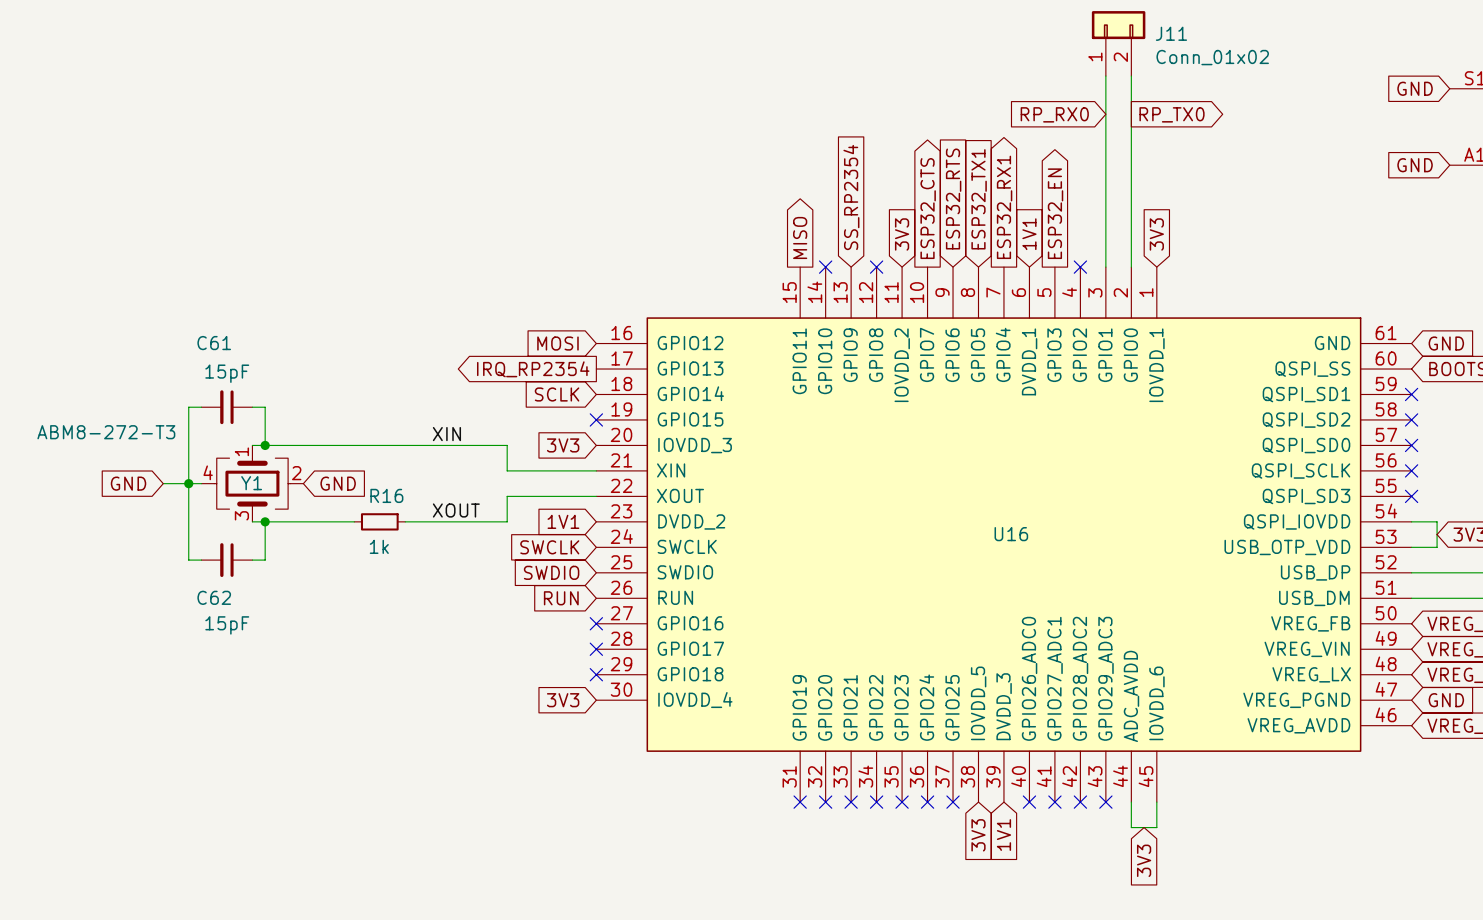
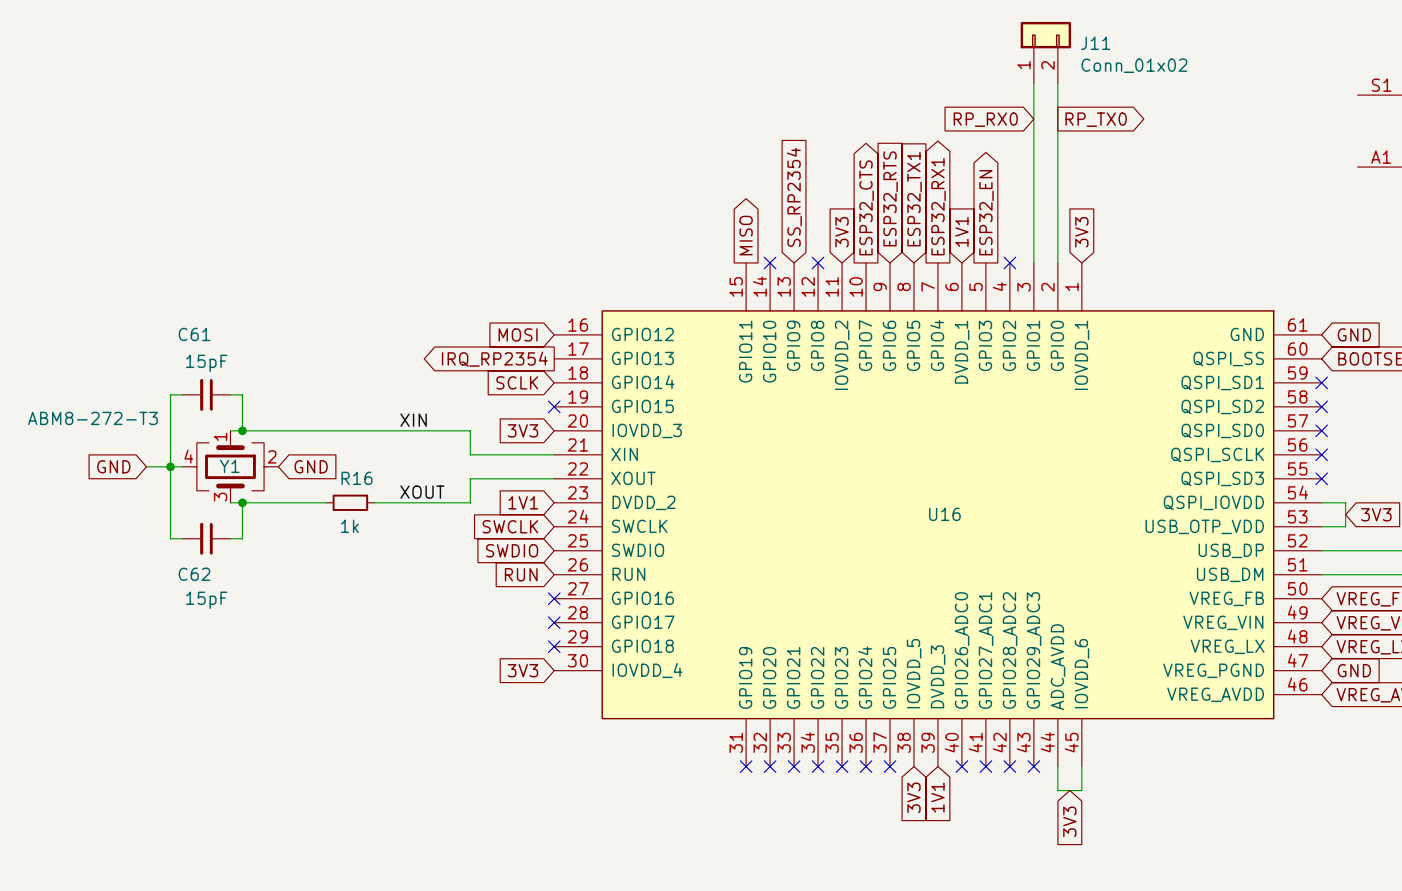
global label: GND (1415, 88) -> none
global label: GND (1415, 165) -> none

